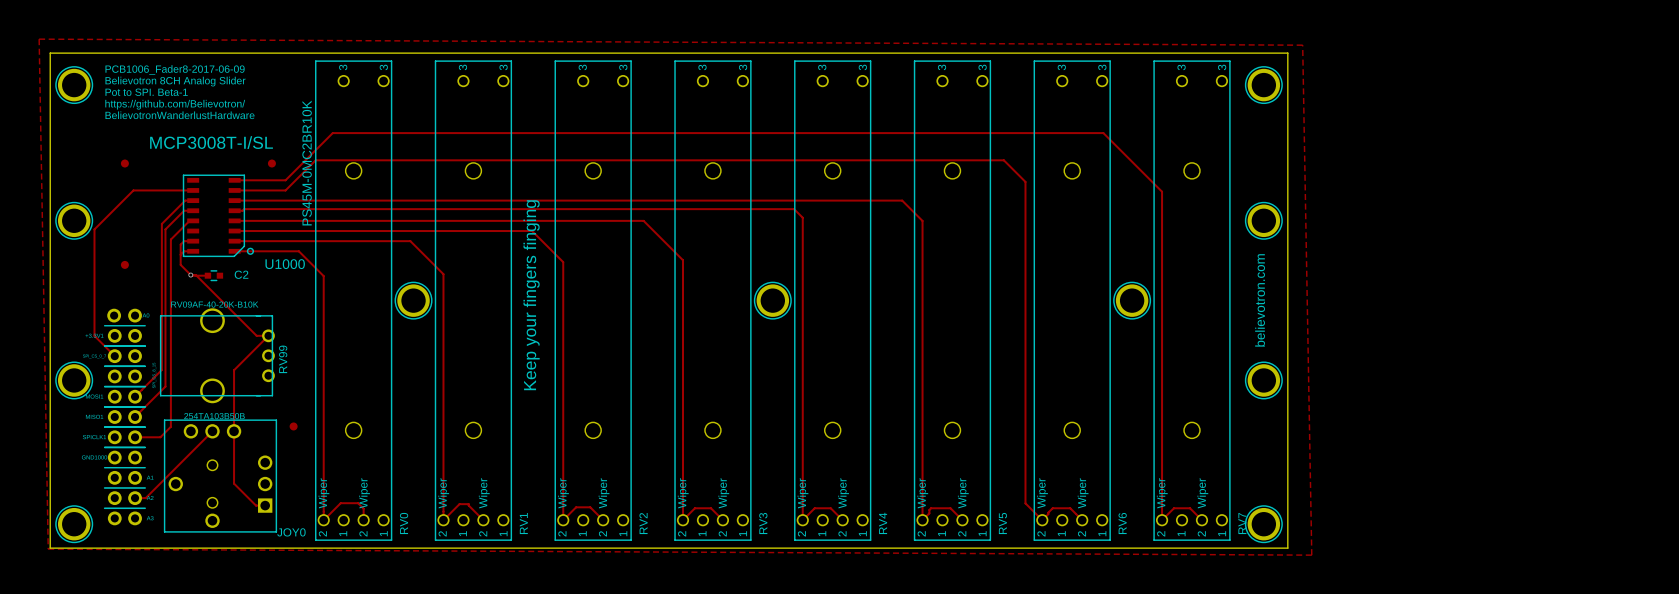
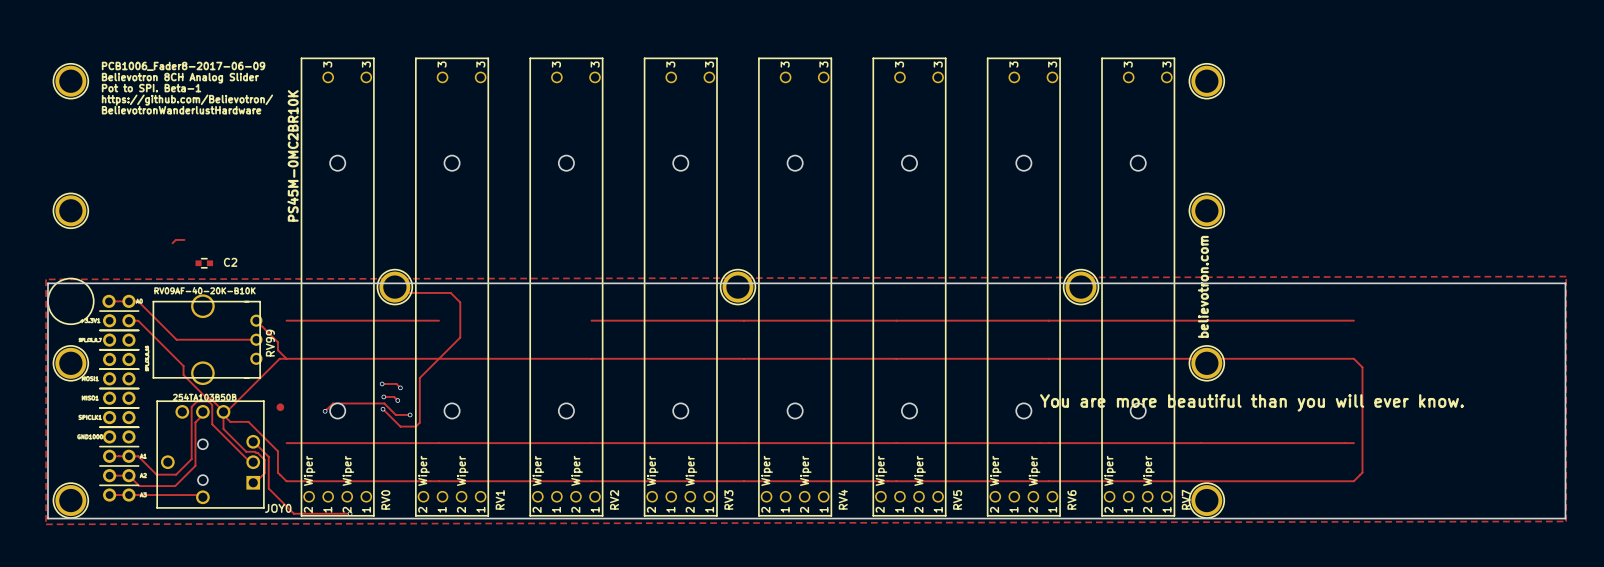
zone outline: (39, 39) (1302, 45) (1311, 555) (48, 549) (39, 39) -> none
text: MCP3008T-I/SL (211, 142) -> none
part: (124, 163) -> none
part: (271, 163) -> none
track: (234, 180) (285, 180) (332, 133) (1103, 133) (1162, 191) (1162, 520) (1173, 508) (1190, 508) (1201, 520) -> none
track: (193, 190) (133, 190) (94, 229) (94, 335) (114, 356) -> none
track: (234, 190) (285, 190) (315, 160) (1003, 160) (1025, 181) (1025, 503) (1042, 520) (1052, 508) (1070, 508) (1082, 520) -> none
track: (193, 200) (185, 200) (161, 223) (161, 369) (135, 396) -> none
track: (234, 200) (902, 200) (922, 220) (922, 520) (929, 513) (931, 508) (950, 508) (962, 520) -> none
track: (193, 210) (184, 210) (165, 229) (165, 386) (135, 417) -> none
track: (234, 210) (244, 209) (794, 209) (802, 217) (802, 520) (814, 508) (830, 508) (842, 520) -> none
U1000: (218, 215) -> none
track: (193, 220) (189, 220) (170, 239) (170, 426) (160, 437) (135, 437) -> none
track: (234, 220) (643, 220) (683, 260) (683, 520) (694, 508) (710, 508) (722, 520) -> none
track: (234, 231) (532, 231) (563, 262) (563, 520) (576, 507) (590, 507) (603, 520) -> none
track: (193, 241) (184, 241) (180, 244) (180, 264) (191, 275) (207, 275) -> none
track: (234, 241) (410, 241) (443, 274) (443, 520) (459, 504) (468, 504) (483, 520) -> none
track: (234, 251) (298, 251) (323, 276) (323, 520) (340, 503) (358, 503) (363, 508) (363, 520) -> none
part: (124, 264) -> none
track: (190, 275) (195, 275) (256, 335) (268, 335) (234, 370) (234, 430) -> (128, 320) (138, 320) (183, 366) (183, 375) (206, 397) (210, 397) (223, 411)
via: (190, 275) -> none
zone outline: none -> (1566, 276) (1566, 521) (46, 524) (46, 279) (1566, 276)
drawing: none -> [47, 277, 95, 326]
text: Keep your fingers finging (531, 295) -> none
board edge: (50, 296) (50, 53) (1287, 53) (1287, 548) (50, 548) (50, 543) -> (47, 283) (1565, 283) (1565, 518) (47, 518)
track: none -> (400, 292) (450, 292) (460, 302) (460, 337) (419, 378) (419, 422) (415, 426) (400, 426) (383, 409)
track: none -> (108, 301) (138, 301) (176, 339) (256, 339)
track: none -> (256, 320) (277, 342) (277, 350) (286, 358)
track: none -> (286, 320) (439, 320)
track: none -> (591, 320) (1353, 320)
track: none -> (382, 383) (396, 383) (400, 387)
via: none -> (382, 383)
via: none -> (400, 387)
track: none -> (383, 396) (394, 396) (397, 400)
via: none -> (383, 396)
via: none -> (397, 400)
text: none -> You are more beautiful than you will ever know. (1251, 402)
via: none -> (383, 409)
track: none -> (325, 411) (332, 403) (384, 403) (395, 414) (410, 414)
via: none -> (325, 411)
track: (212, 431) (145, 498) (135, 498) -> none
track: none -> (221, 413) (230, 421) (248, 421) (277, 451) (277, 472) (286, 481) (1353, 481) (1362, 472) (1362, 367) (1353, 358) (279, 358) (223, 415)
track: none -> (202, 415) (195, 422) (195, 465) (175, 486) (139, 486) (128, 475) (109, 475)
via: none -> (410, 414)
track: (234, 449) (234, 483) (256, 505) (265, 505) -> (223, 429) (246, 451) (257, 452) (264, 460) (264, 473) (253, 485)
track: none -> (255, 443) (268, 456) (268, 488) (293, 513) (350, 513)
track: none -> (286, 443) (1353, 443)
track: none -> (109, 456) (138, 456) (156, 474) (176, 474) (191, 459) (191, 406) (197, 401) (208, 401) (212, 404) (212, 424) (253, 465)
track: none -> (109, 495) (200, 495) (202, 497)
via: none -> (350, 513)

